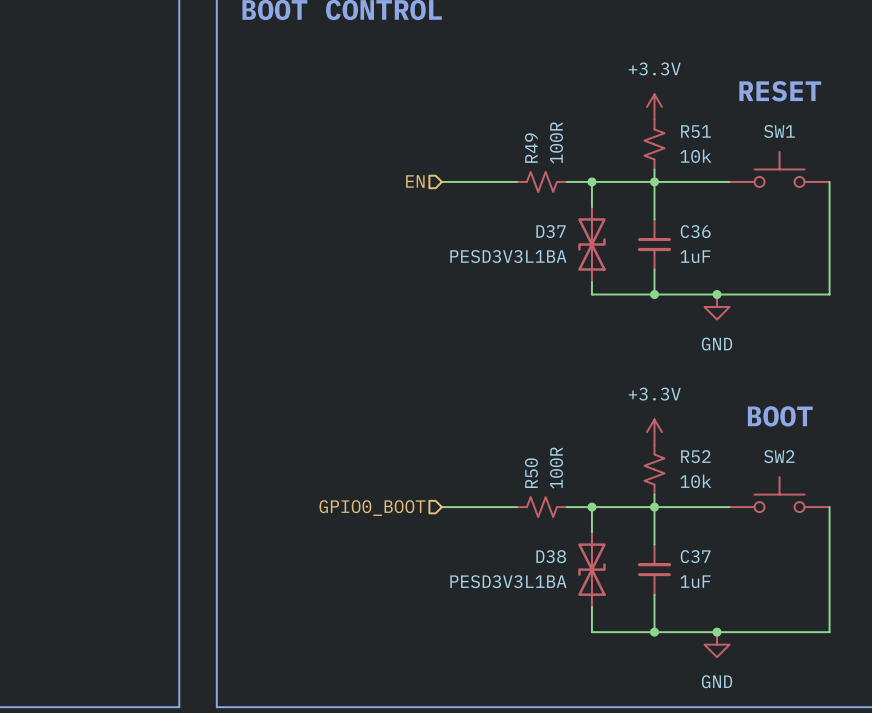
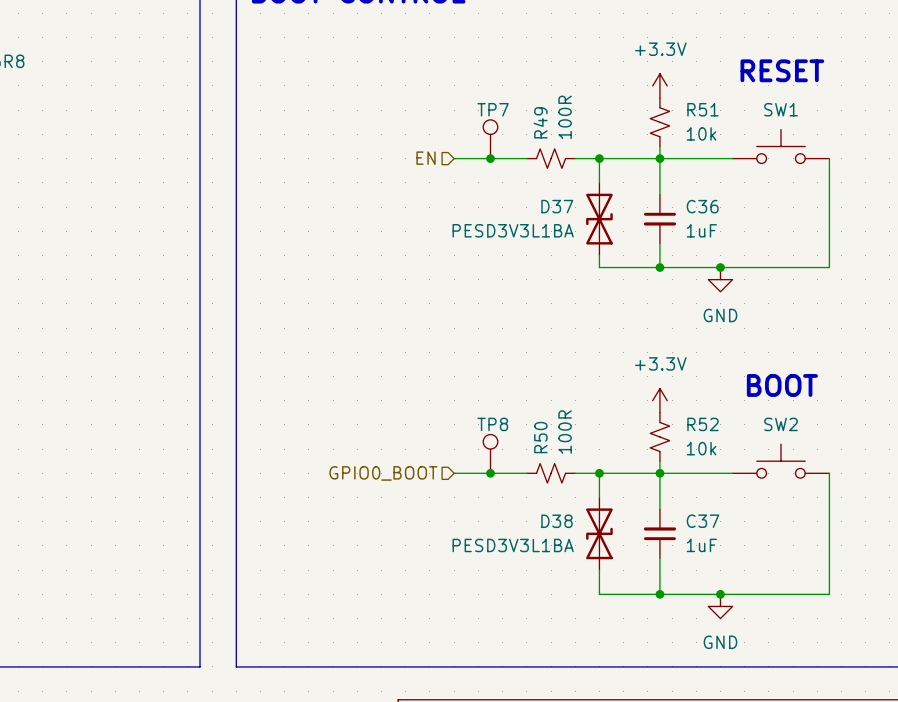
TP7: none -> (490, 139)
junction: none -> (490, 158)
TP8: none -> (490, 453)
junction: none -> (490, 473)

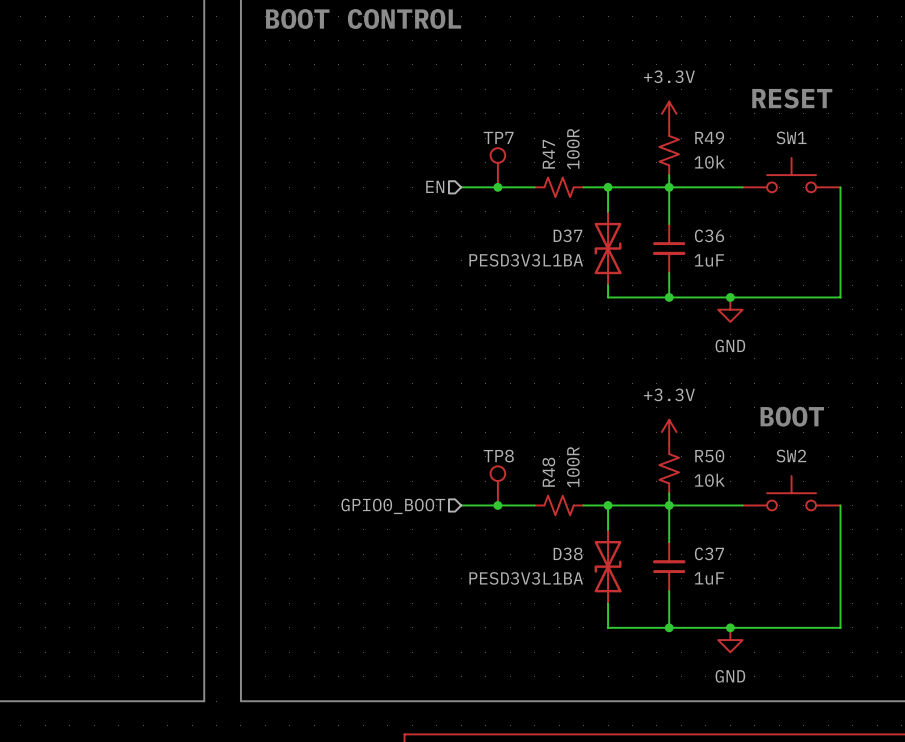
R51 name: R51 (702, 109) -> R49 (709, 137)
R49 name: R49 (540, 122) -> R47 (548, 154)
R52 name: R52 (702, 424) -> R50 (709, 456)
R50 name: R50 (540, 437) -> R48 (548, 472)

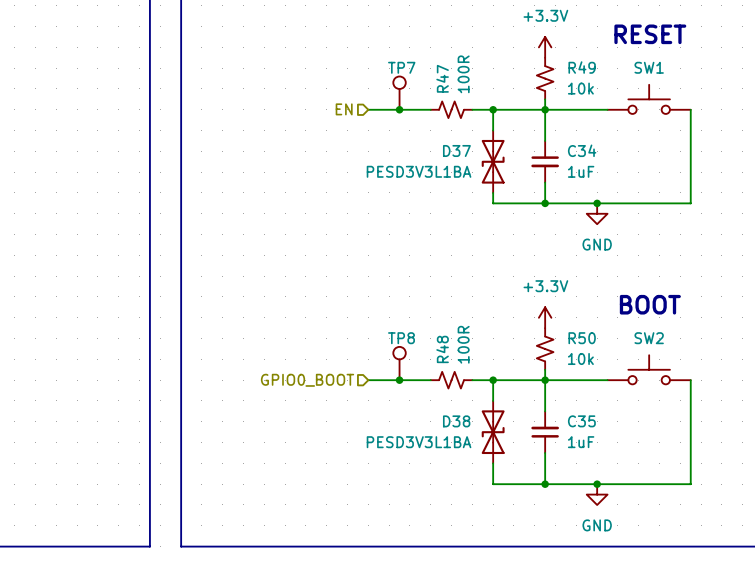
C36 name: C36 (709, 235) -> C34 (582, 150)
C37 name: C37 (709, 553) -> C35 (581, 421)

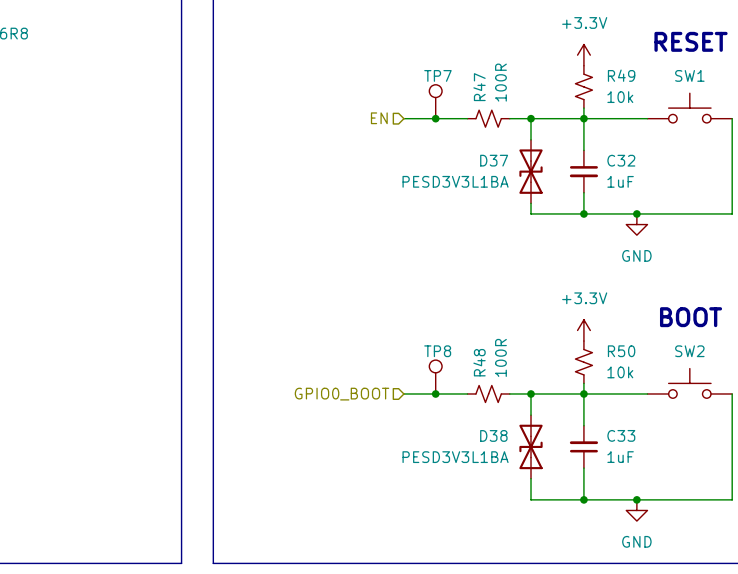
C34 name: C34 (582, 150) -> C32 (621, 160)
C35 name: C35 (581, 421) -> C33 (621, 435)

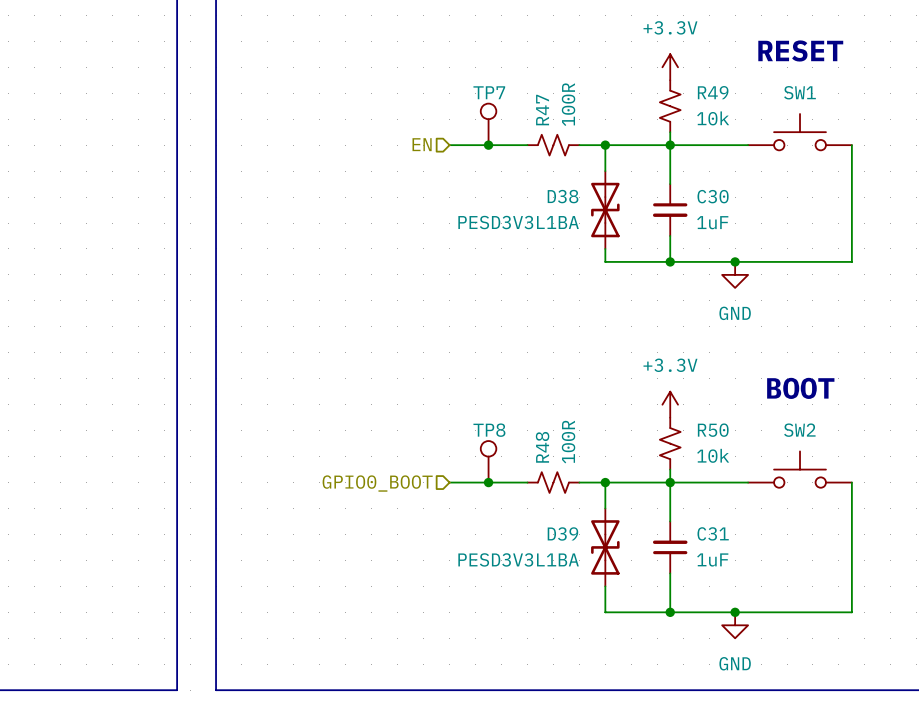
D37 name: D37 (494, 160) -> D38 (563, 196)
C32 name: C32 (621, 160) -> C30 (713, 196)
D38 name: D38 (493, 435) -> D39 (562, 533)
C33 name: C33 (621, 435) -> C31 (713, 533)

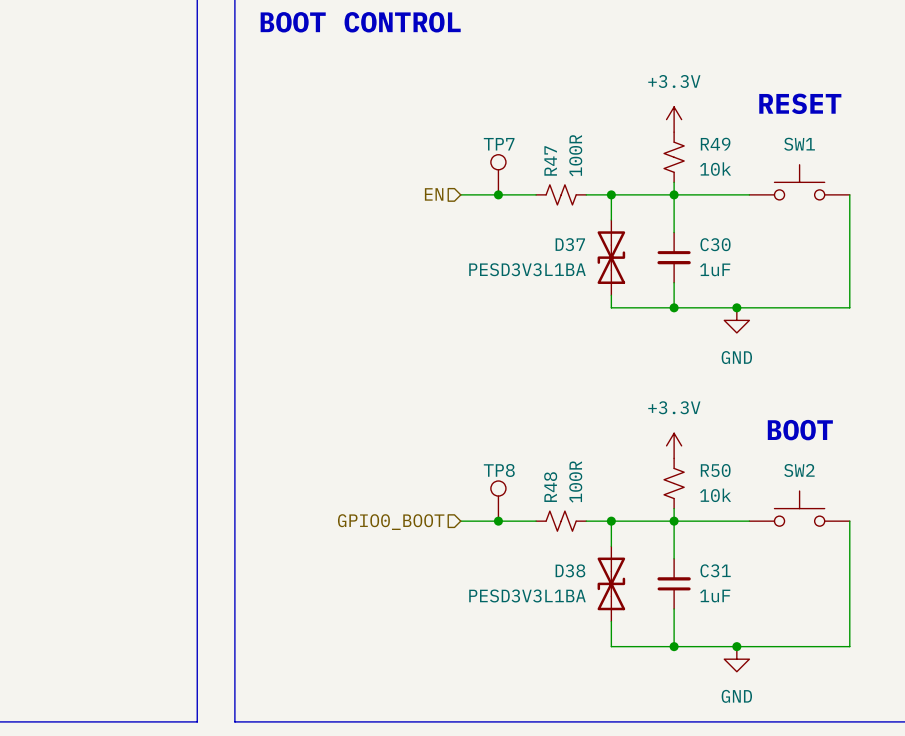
D38 name: D38 (563, 196) -> D37 (570, 244)
D39 name: D39 (562, 533) -> D38 (570, 570)

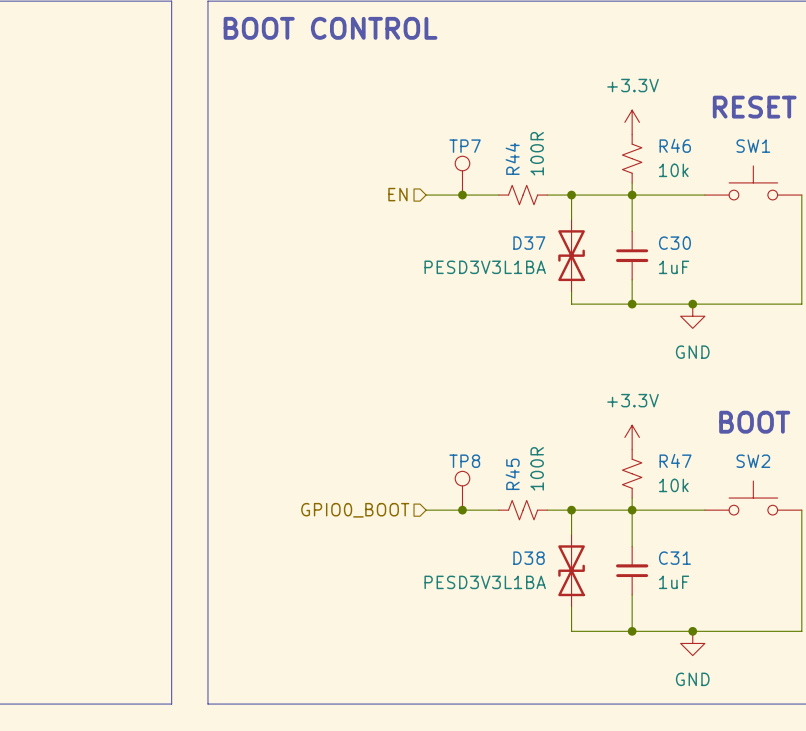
R49 name: R49 (715, 144) -> R46 (675, 145)
R47 name: R47 (550, 160) -> R44 (512, 158)
R50 name: R50 (715, 470) -> R47 (675, 460)
R48 name: R48 (550, 487) -> R45 (512, 474)

